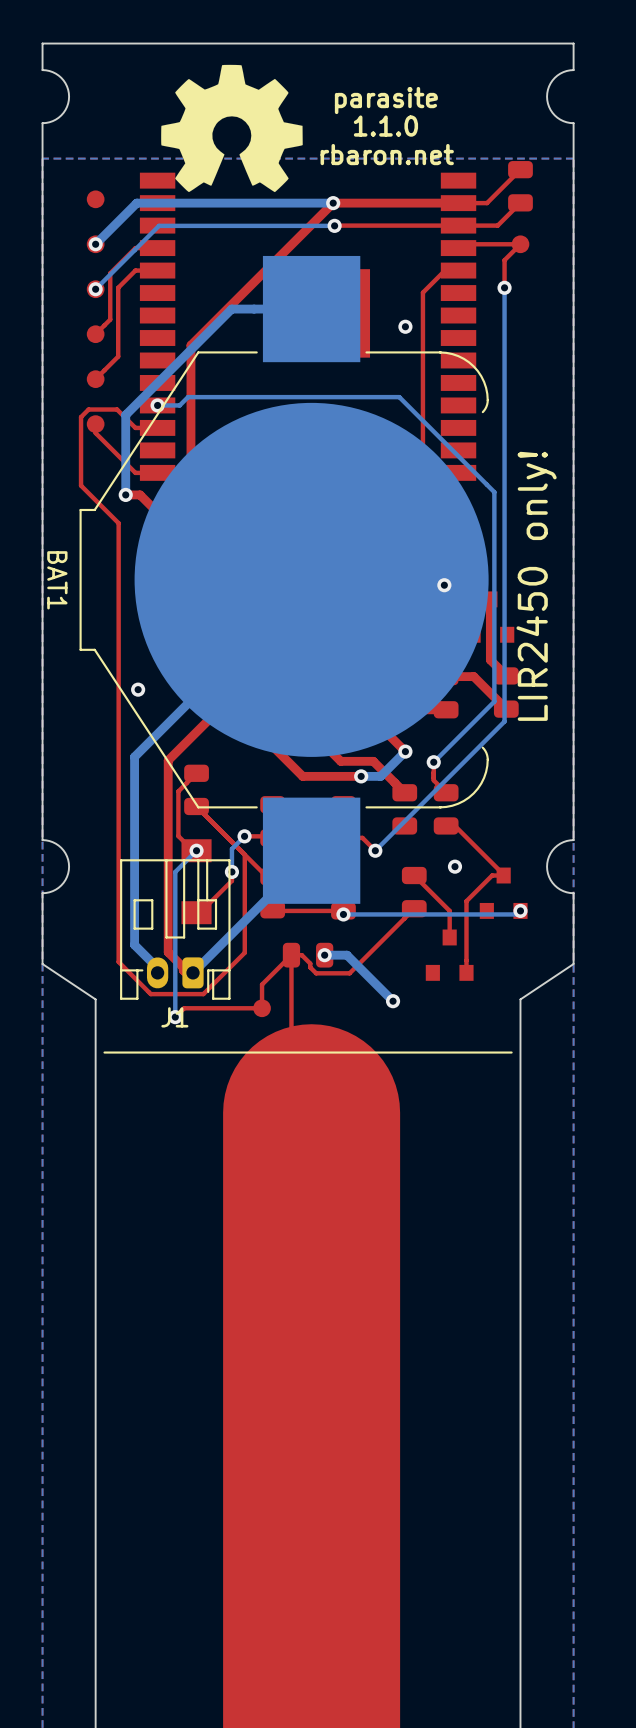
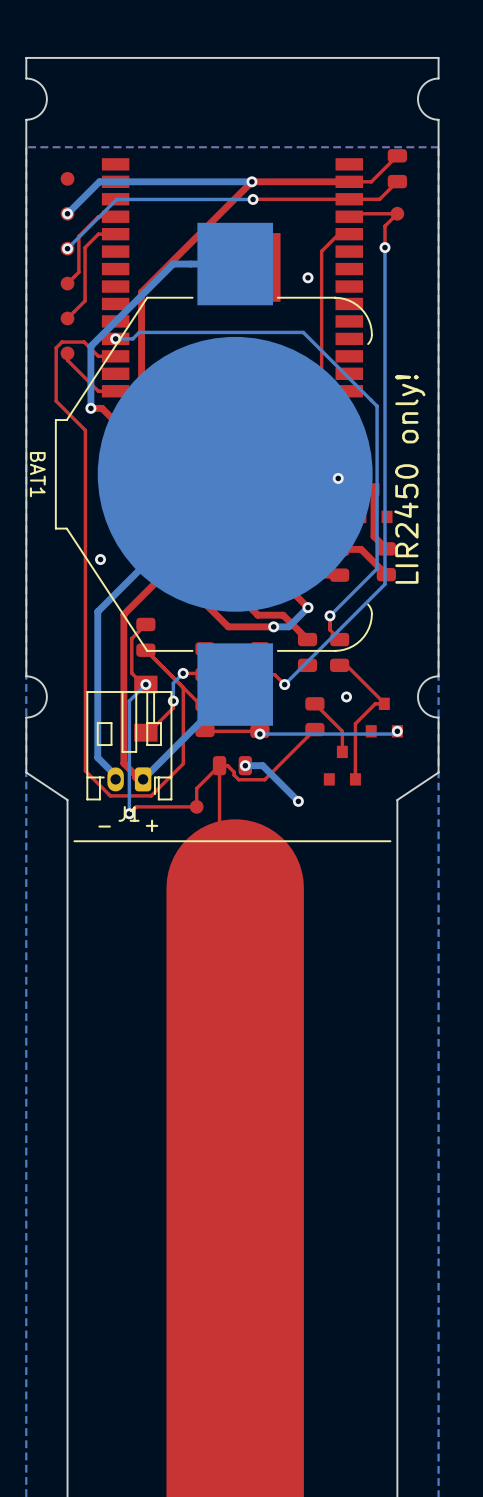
drawing: [161, 64, 303, 193] -> none
text: parasite (386, 100) -> none
text: 1.1.0 (385, 126) -> none
text: rbaron.net (387, 154) -> none
text: none -> + (152, 825)
text: none -> - (104, 826)

